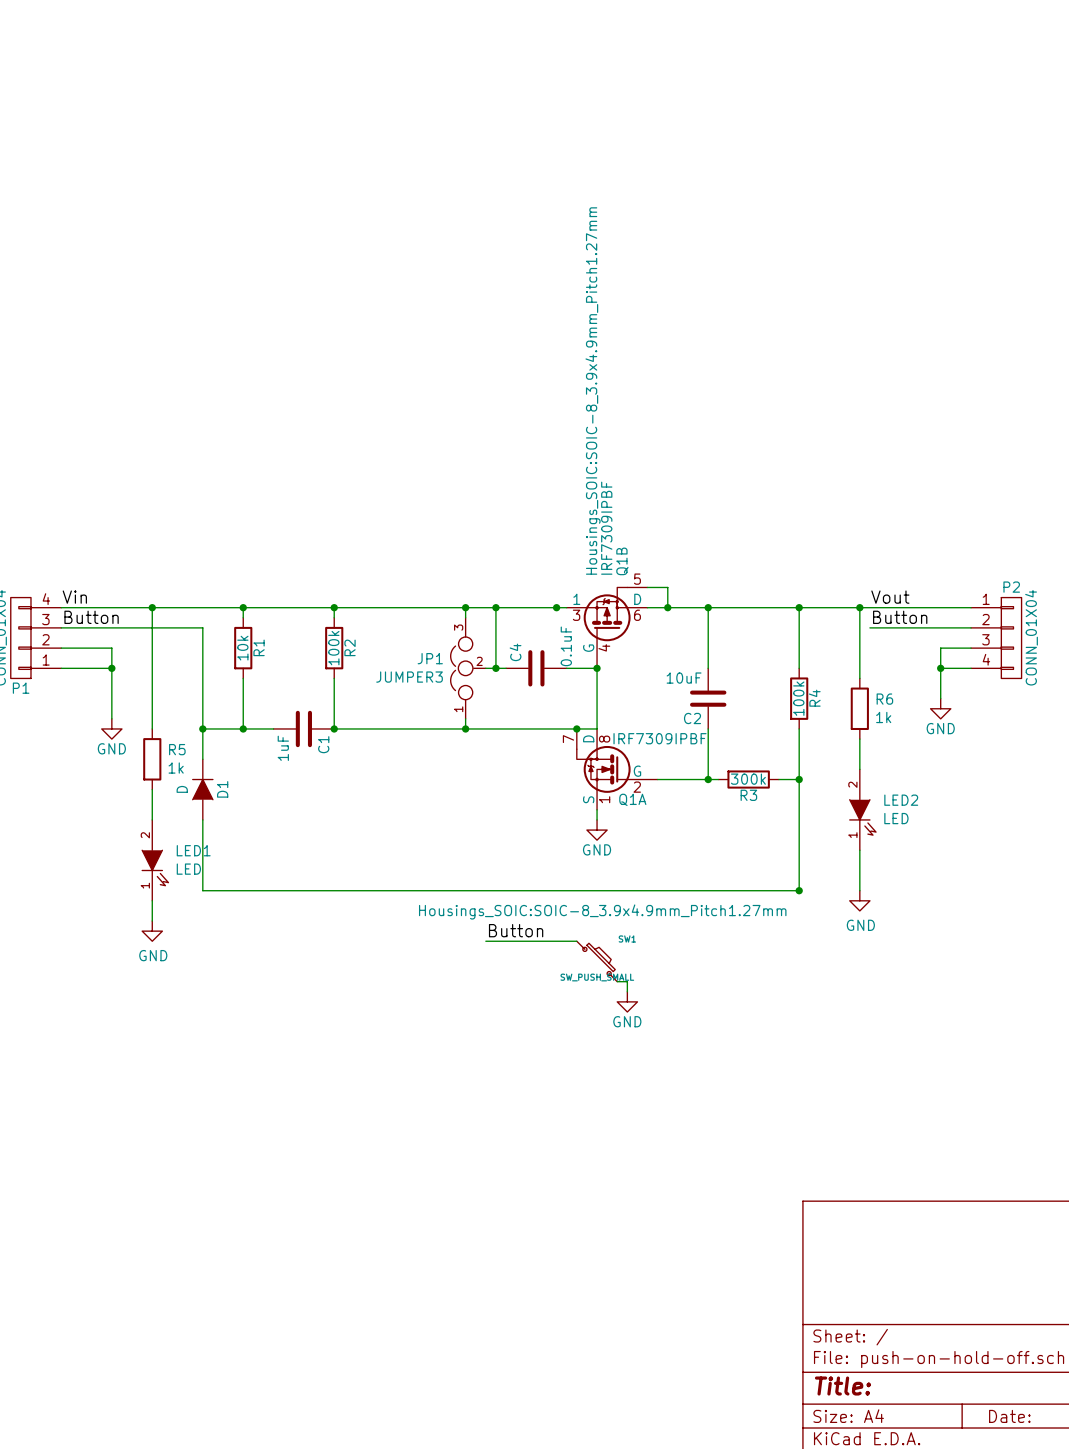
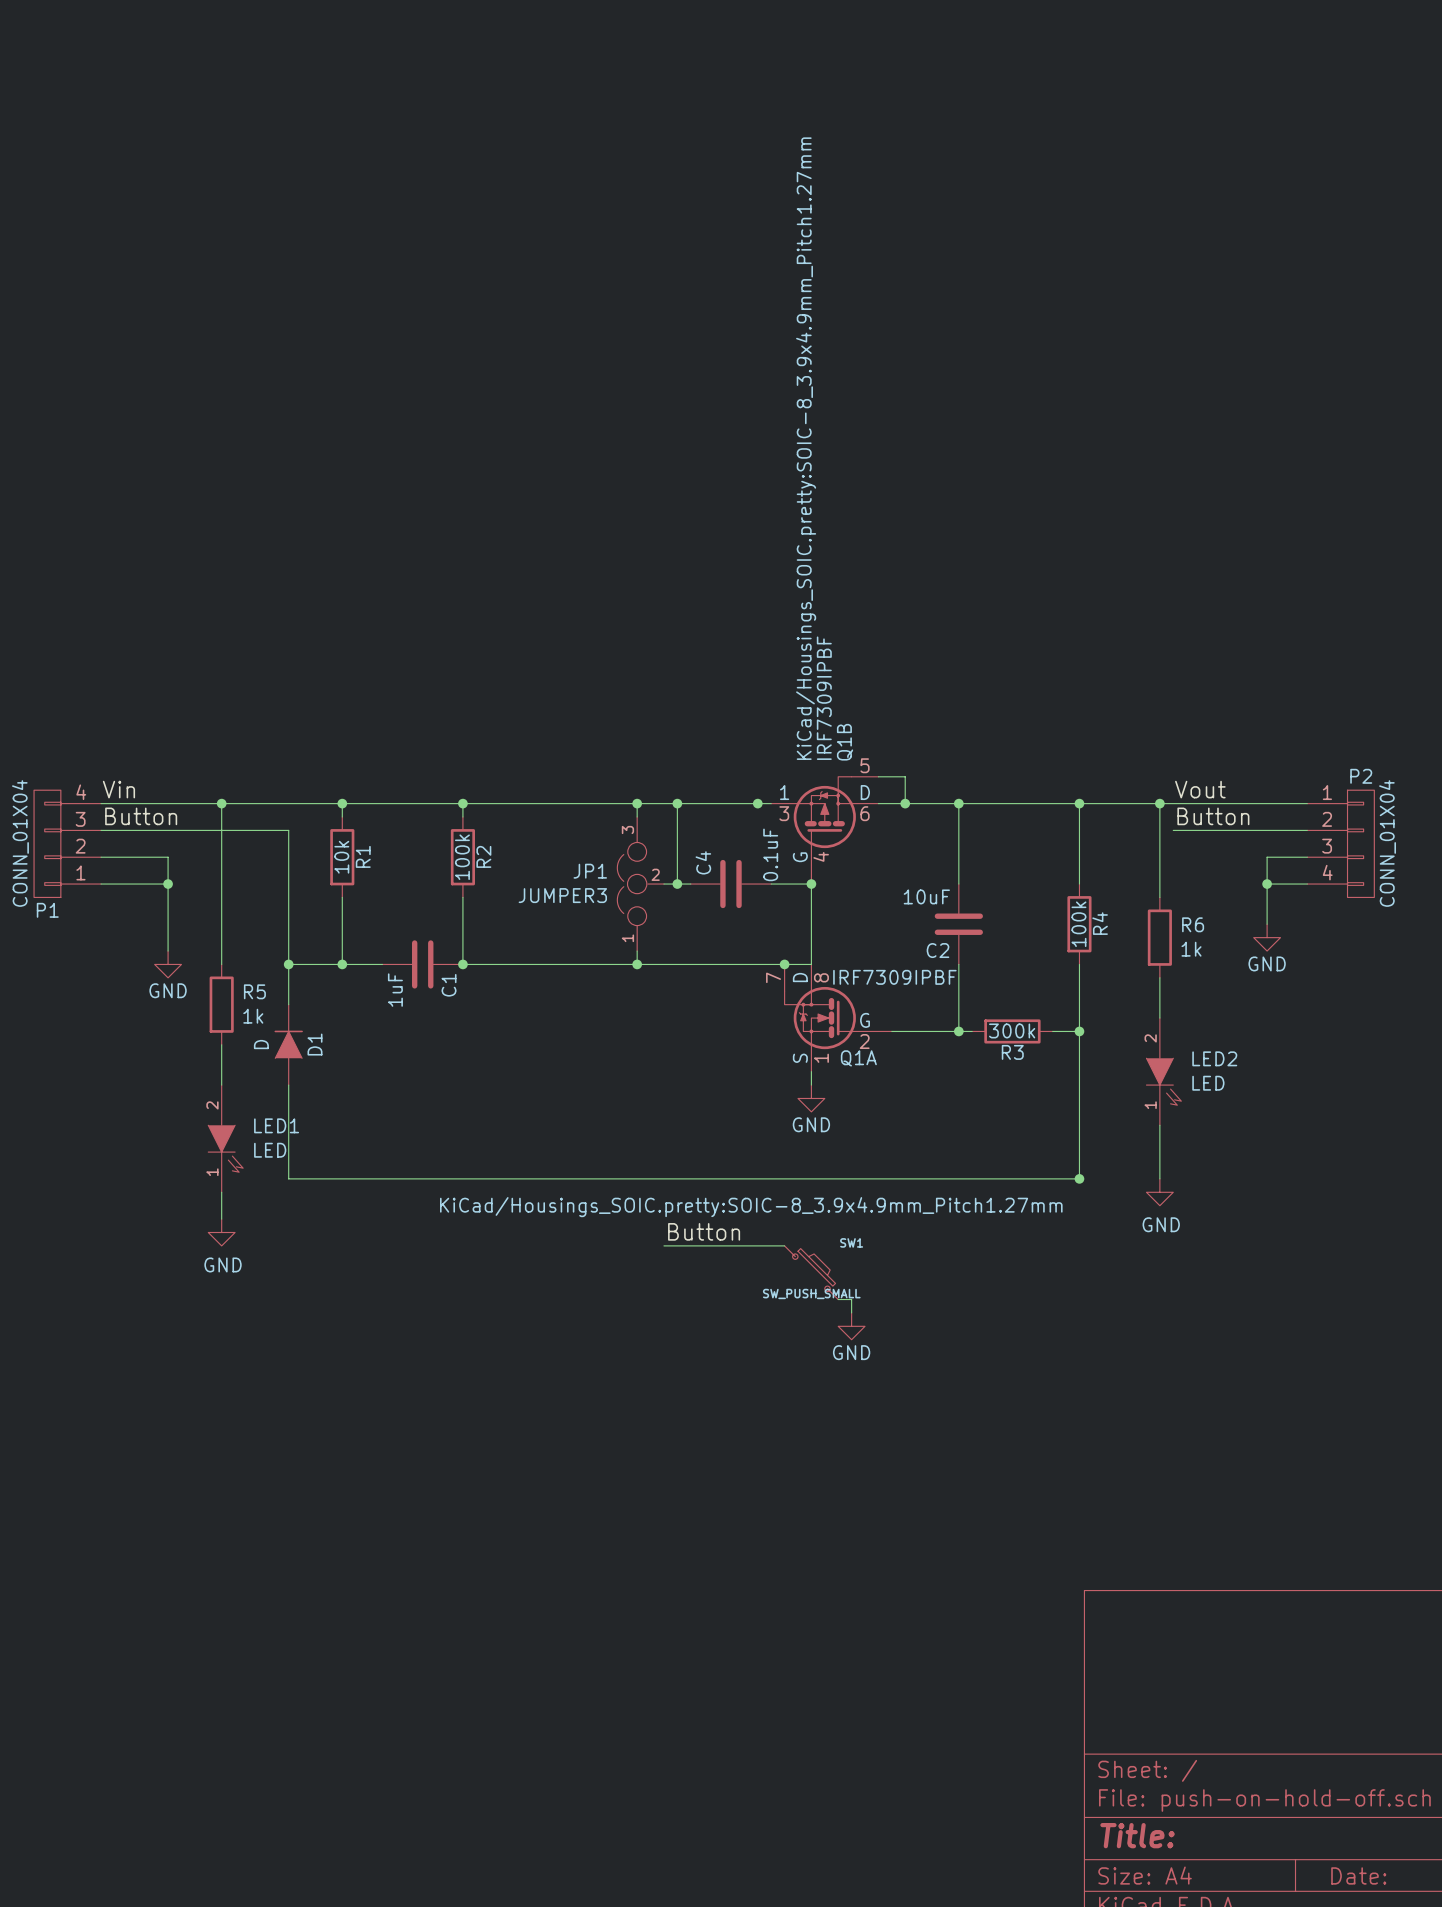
Q1B text: Housings_SOIC:SOIC-8_3.9x4.9mm_Pitch1.27mm (593, 391) -> KiCad/Housings_SOIC.pretty:SOIC-8_3.9x4.9mm_Pitch1.27mm (806, 448)
Q1A text: Housings_SOIC:SOIC-8_3.9x4.9mm_Pitch1.27mm (602, 911) -> KiCad/Housings_SOIC.pretty:SOIC-8_3.9x4.9mm_Pitch1.27mm (751, 1207)

